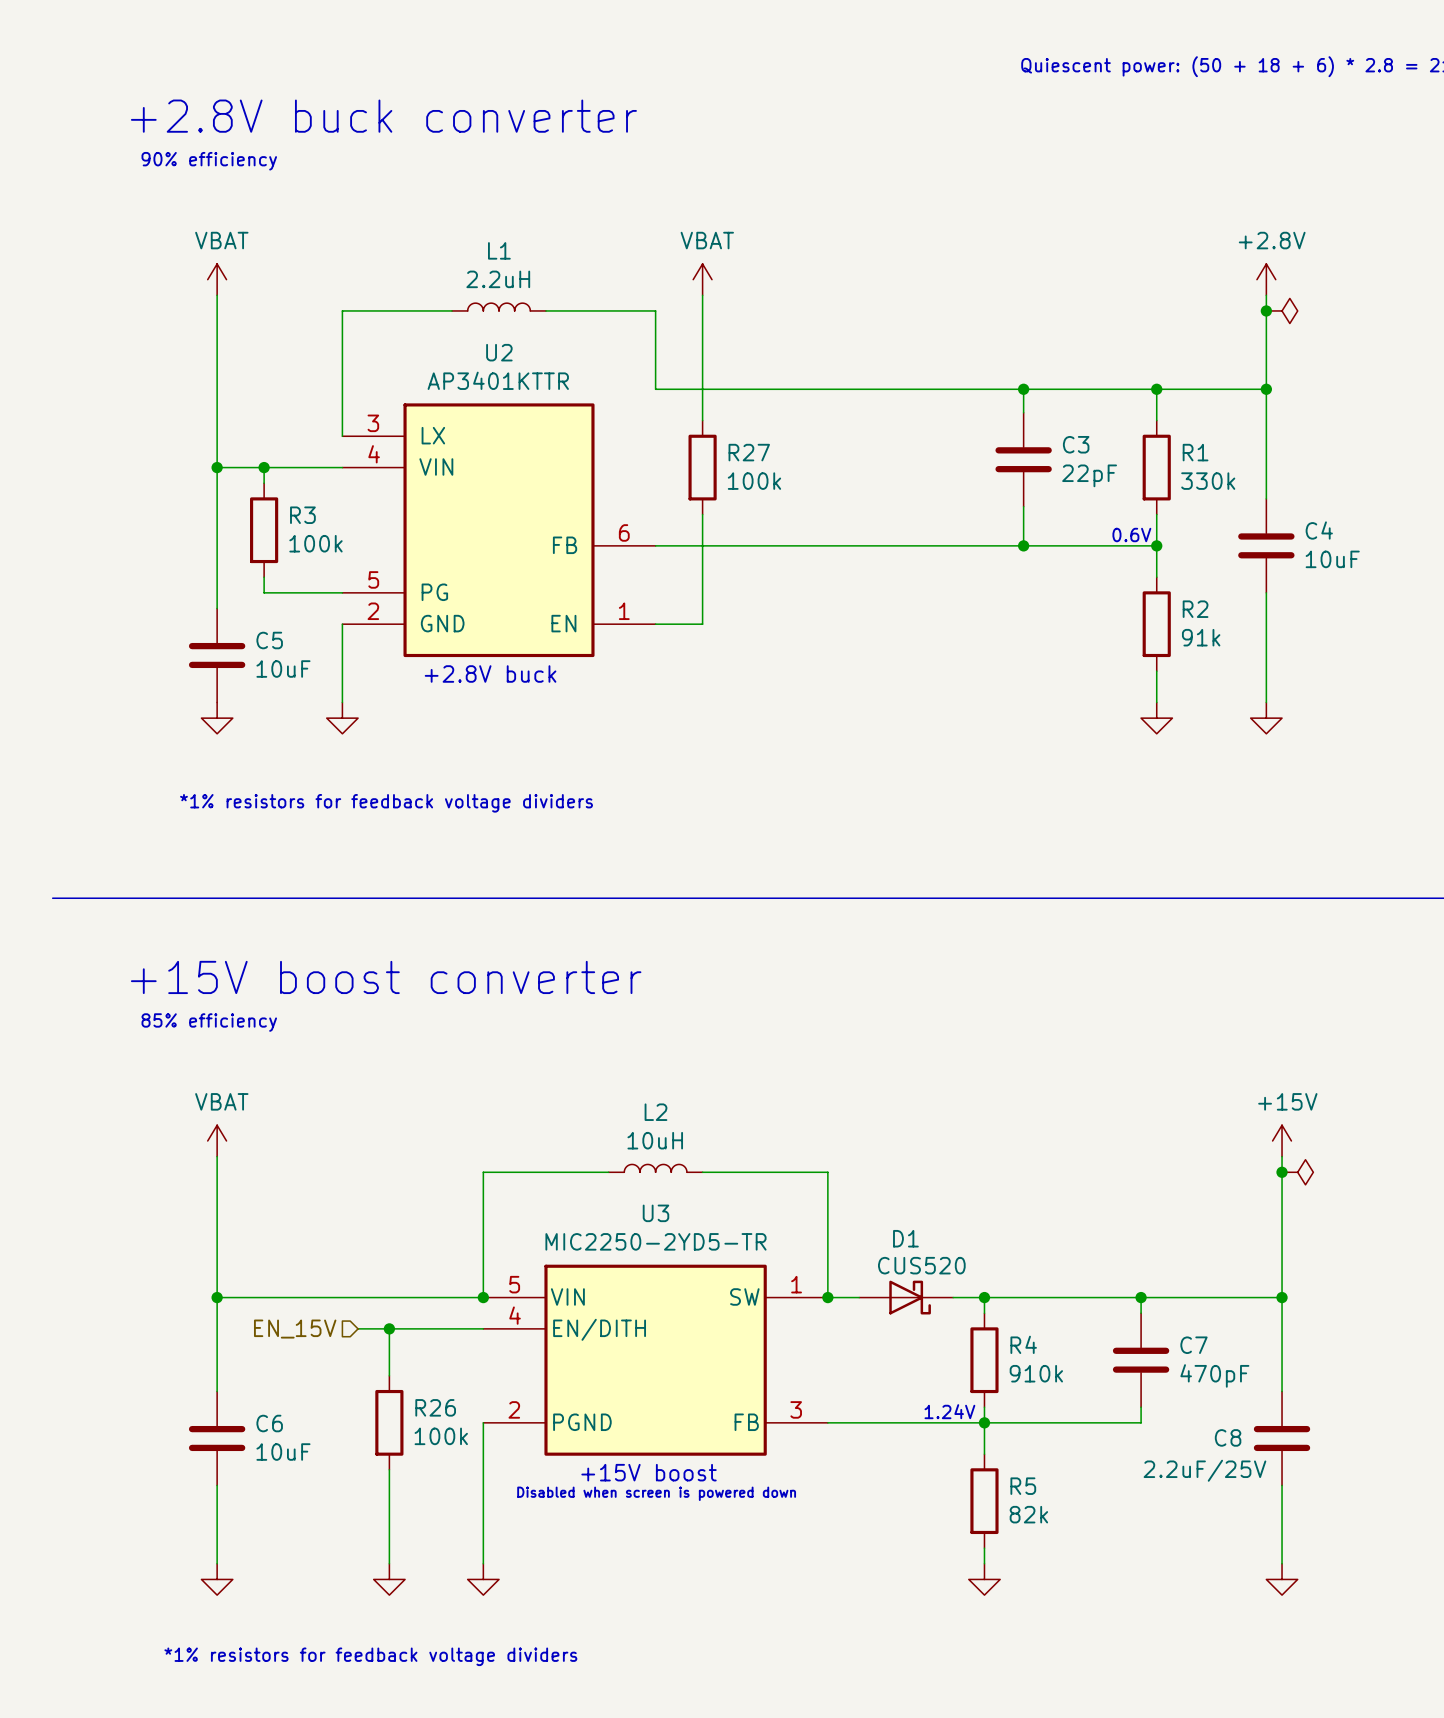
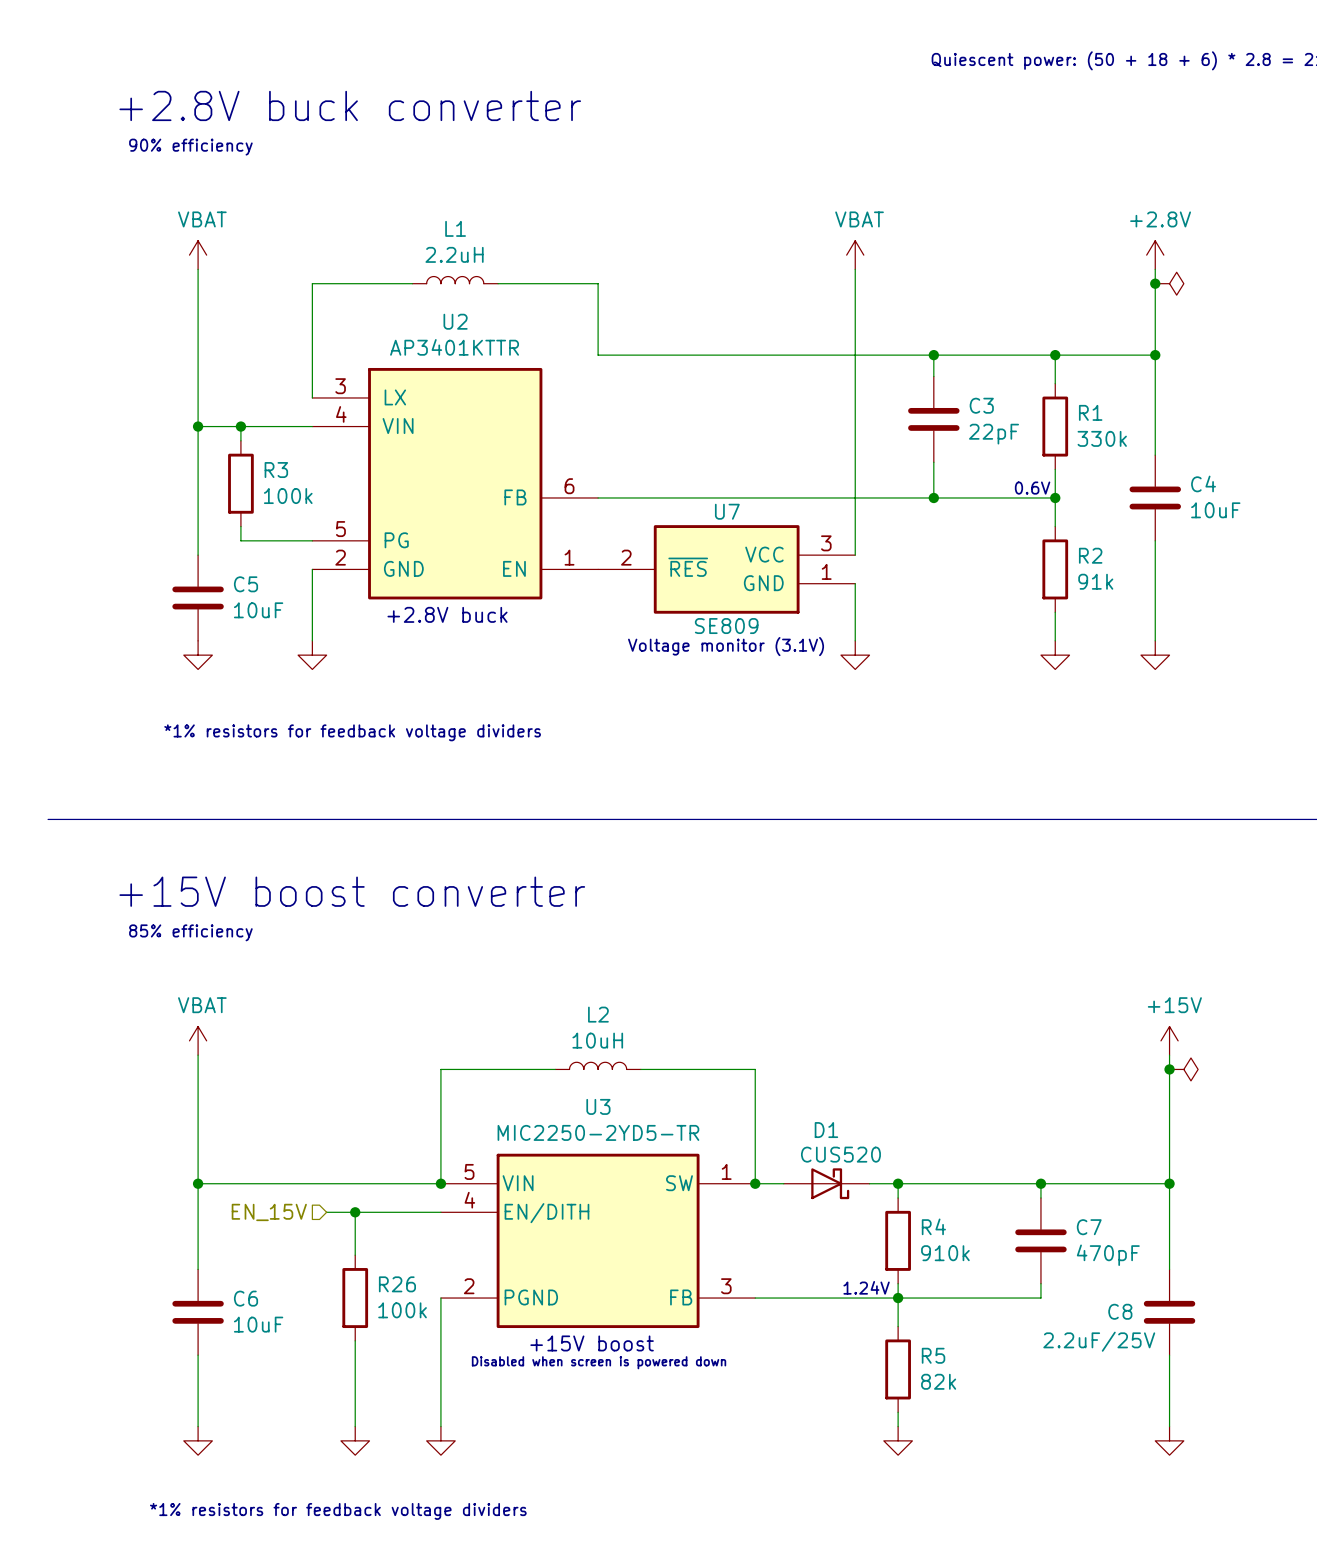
power symbol position: VBAT (702, 279) -> VBAT (855, 255)
wire: (702, 295) (702, 420) -> none
wire: none -> (855, 269) (855, 555)
R27: 100k (702, 467) -> none
wire: (702, 514) (702, 624) (655, 624) -> none
U7: none -> SE809 (726, 569)
wire: none -> (855, 583) (855, 640)
text: none -> Voltage monitor (3.1V) (726, 646)
power symbol: none -> (855, 655)

